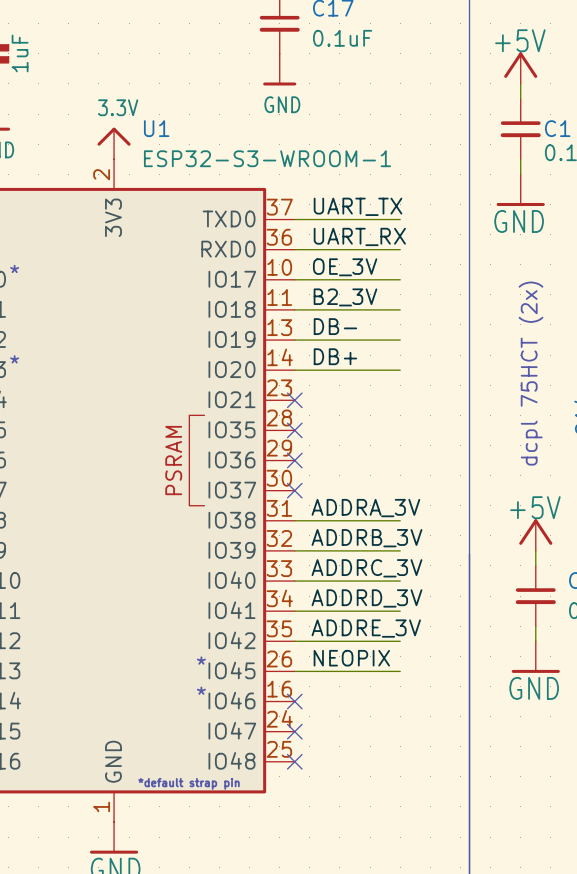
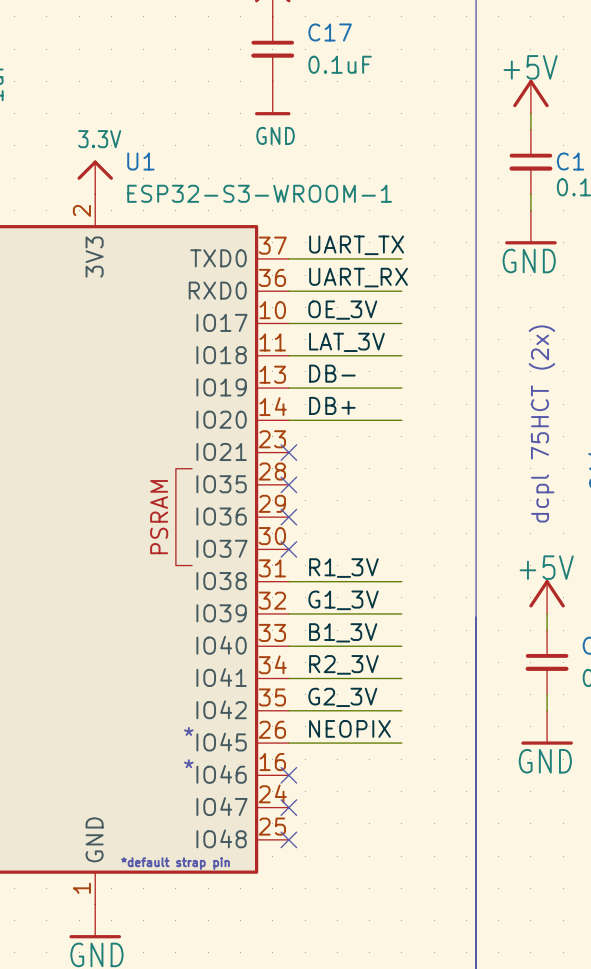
label: B2_3V (345, 297) -> LAT_3V (346, 342)
label: ADDRA_3V (365, 508) -> R1_3V (343, 568)
label: ADDRB_3V (366, 538) -> G1_3V (343, 600)
label: ADDRC_3V (366, 568) -> B1_3V (343, 632)
label: ADDRD_3V (366, 598) -> R2_3V (343, 664)
label: ADDRE_3V (366, 628) -> G2_3V (342, 697)

